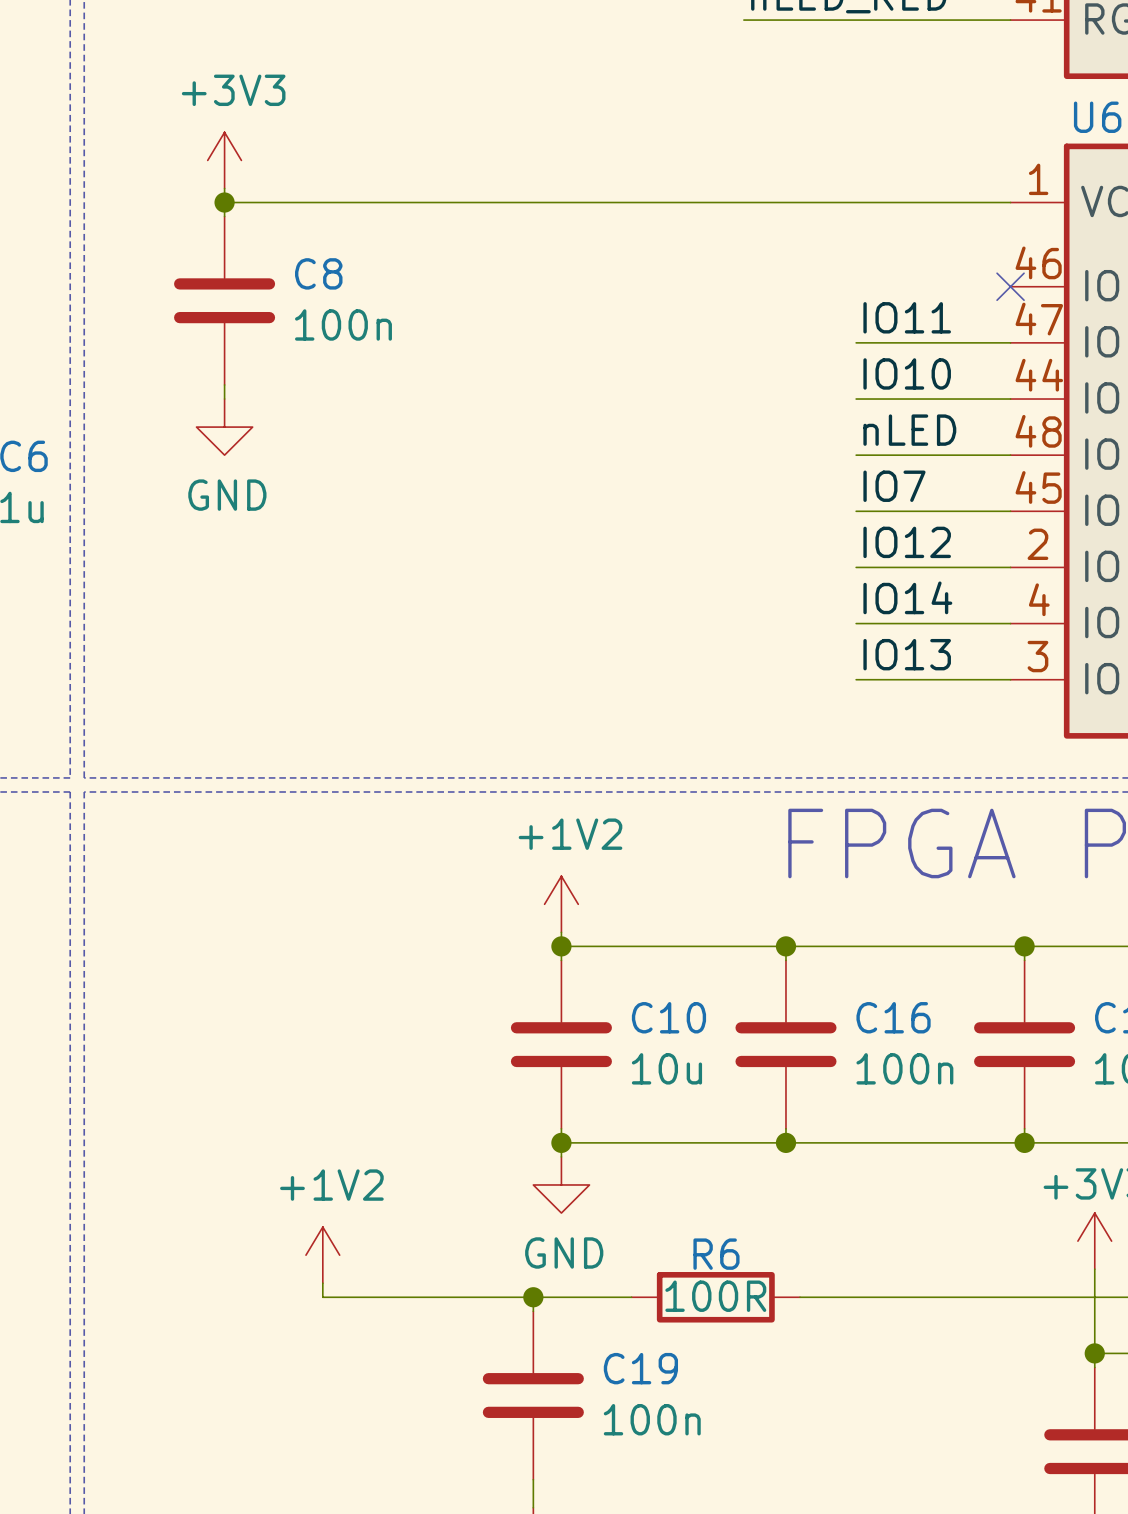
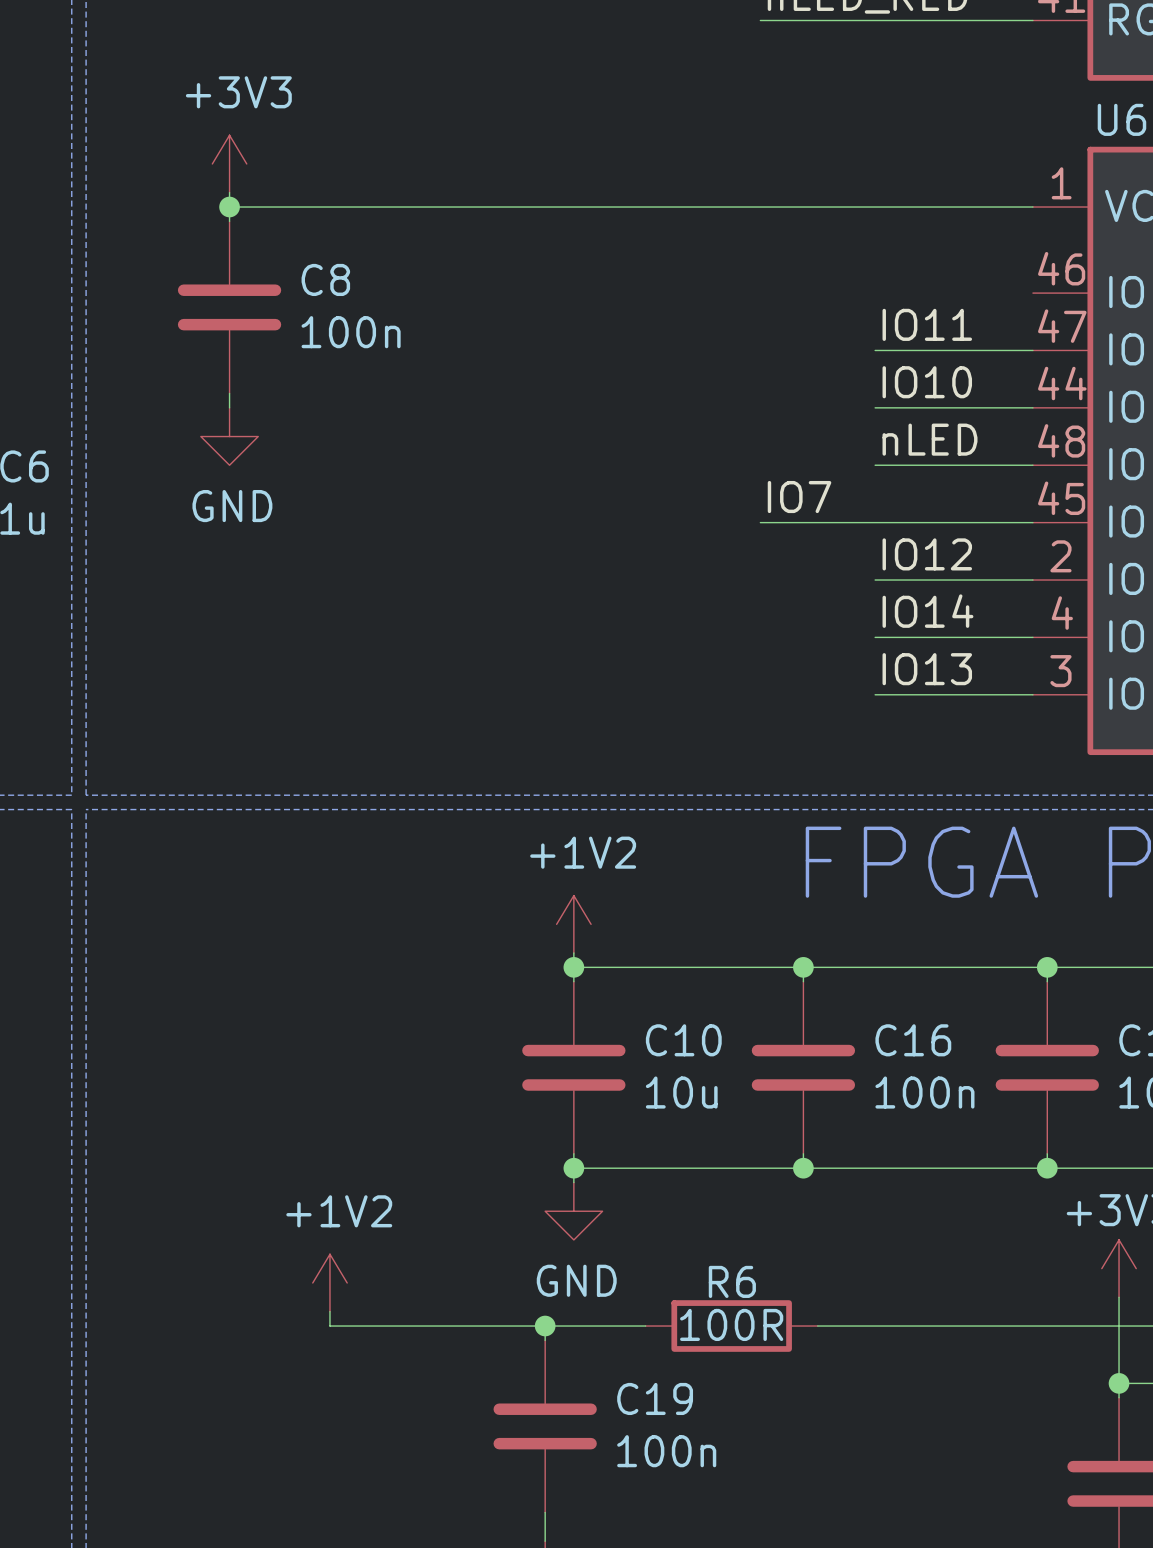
no-connect mark: (1010, 286) -> none
label position: IO7 (894, 486) -> IO7 (799, 497)
wire: none -> (760, 522) (875, 522)

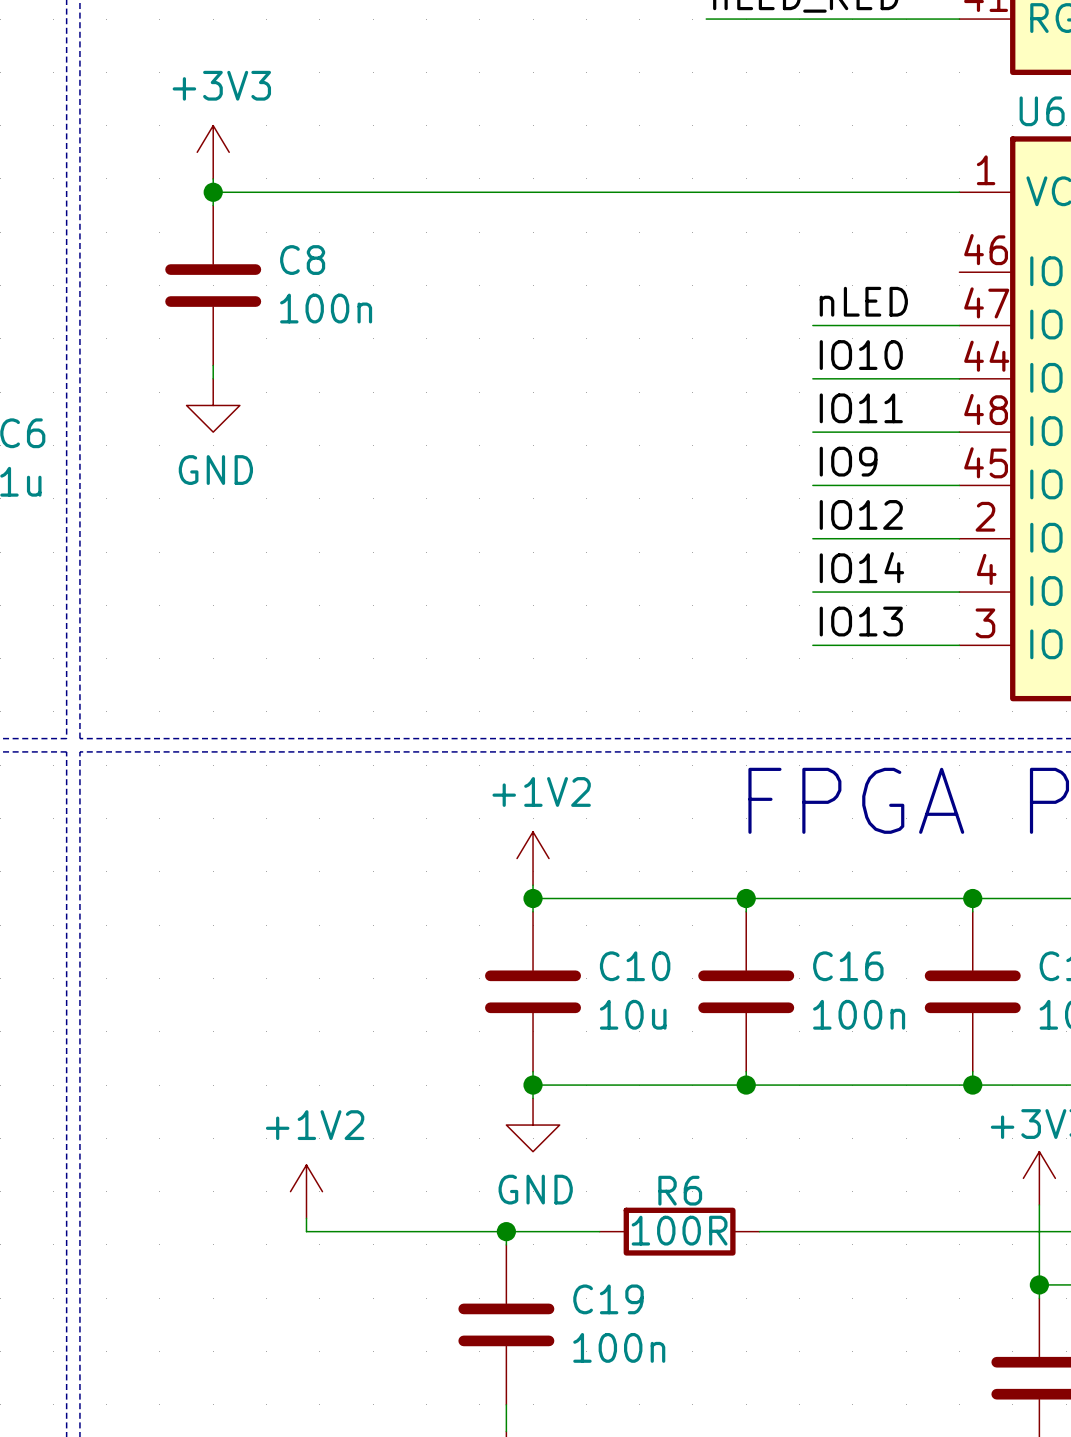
label: IO11 (927, 324) -> nLED (863, 301)
label: nLED (930, 439) -> IO11 (861, 408)
label: IO7 (799, 497) -> none
label: none -> IO9 (848, 461)
wire: (760, 522) (875, 522) -> none

